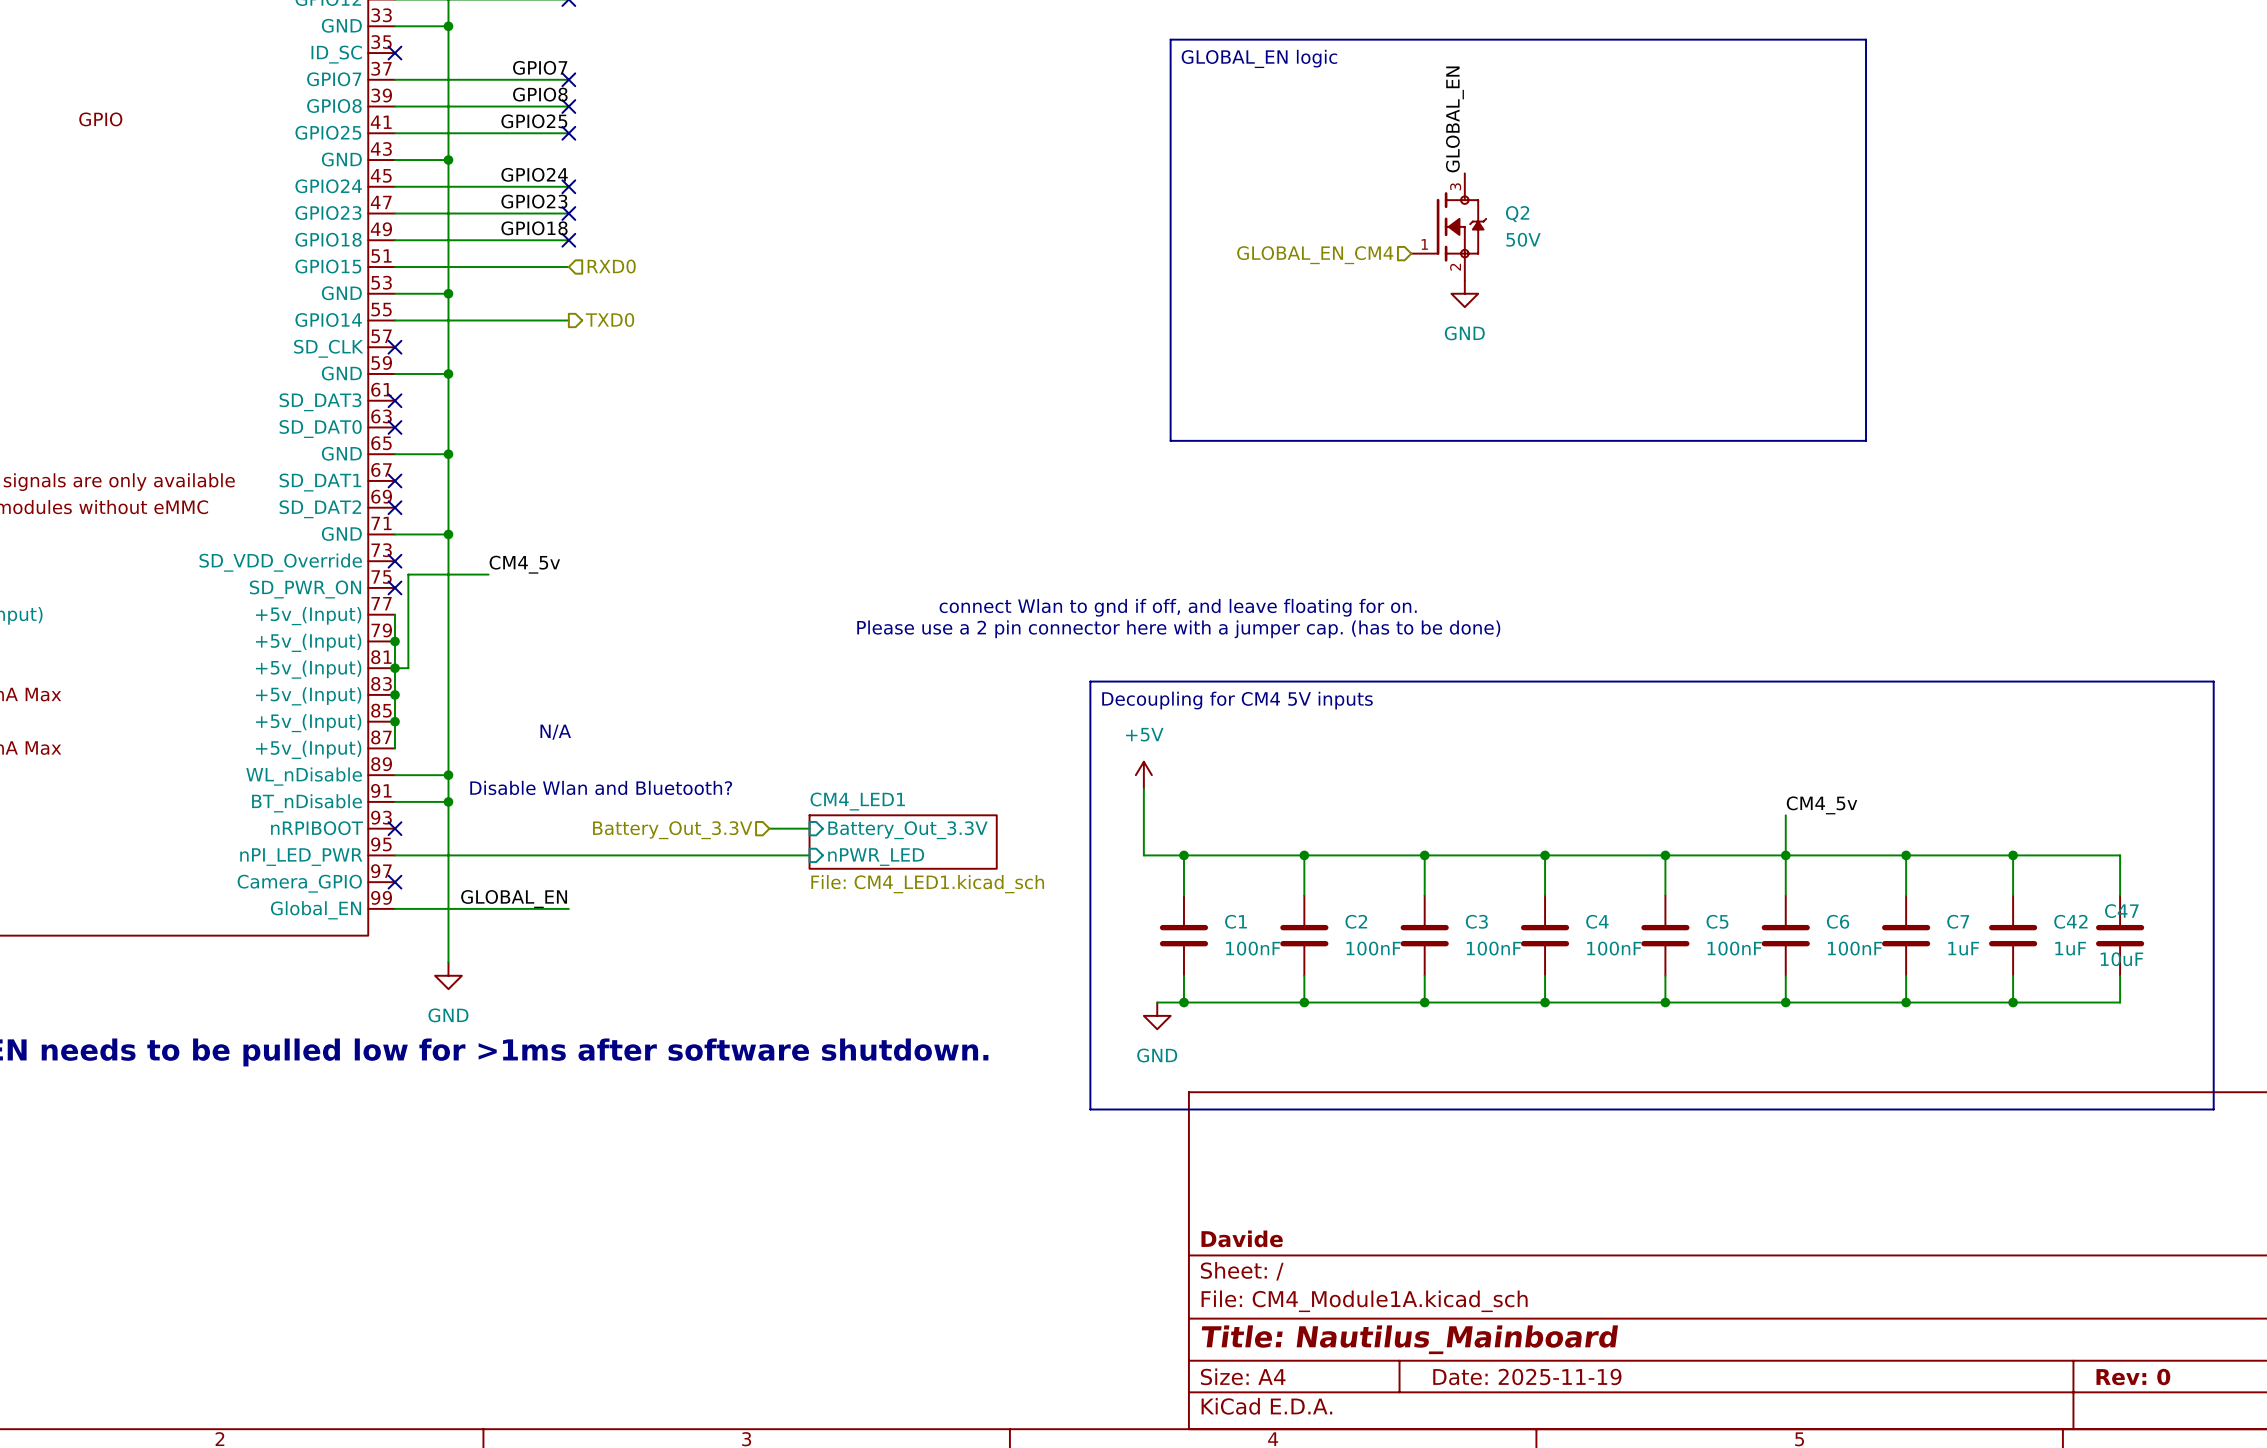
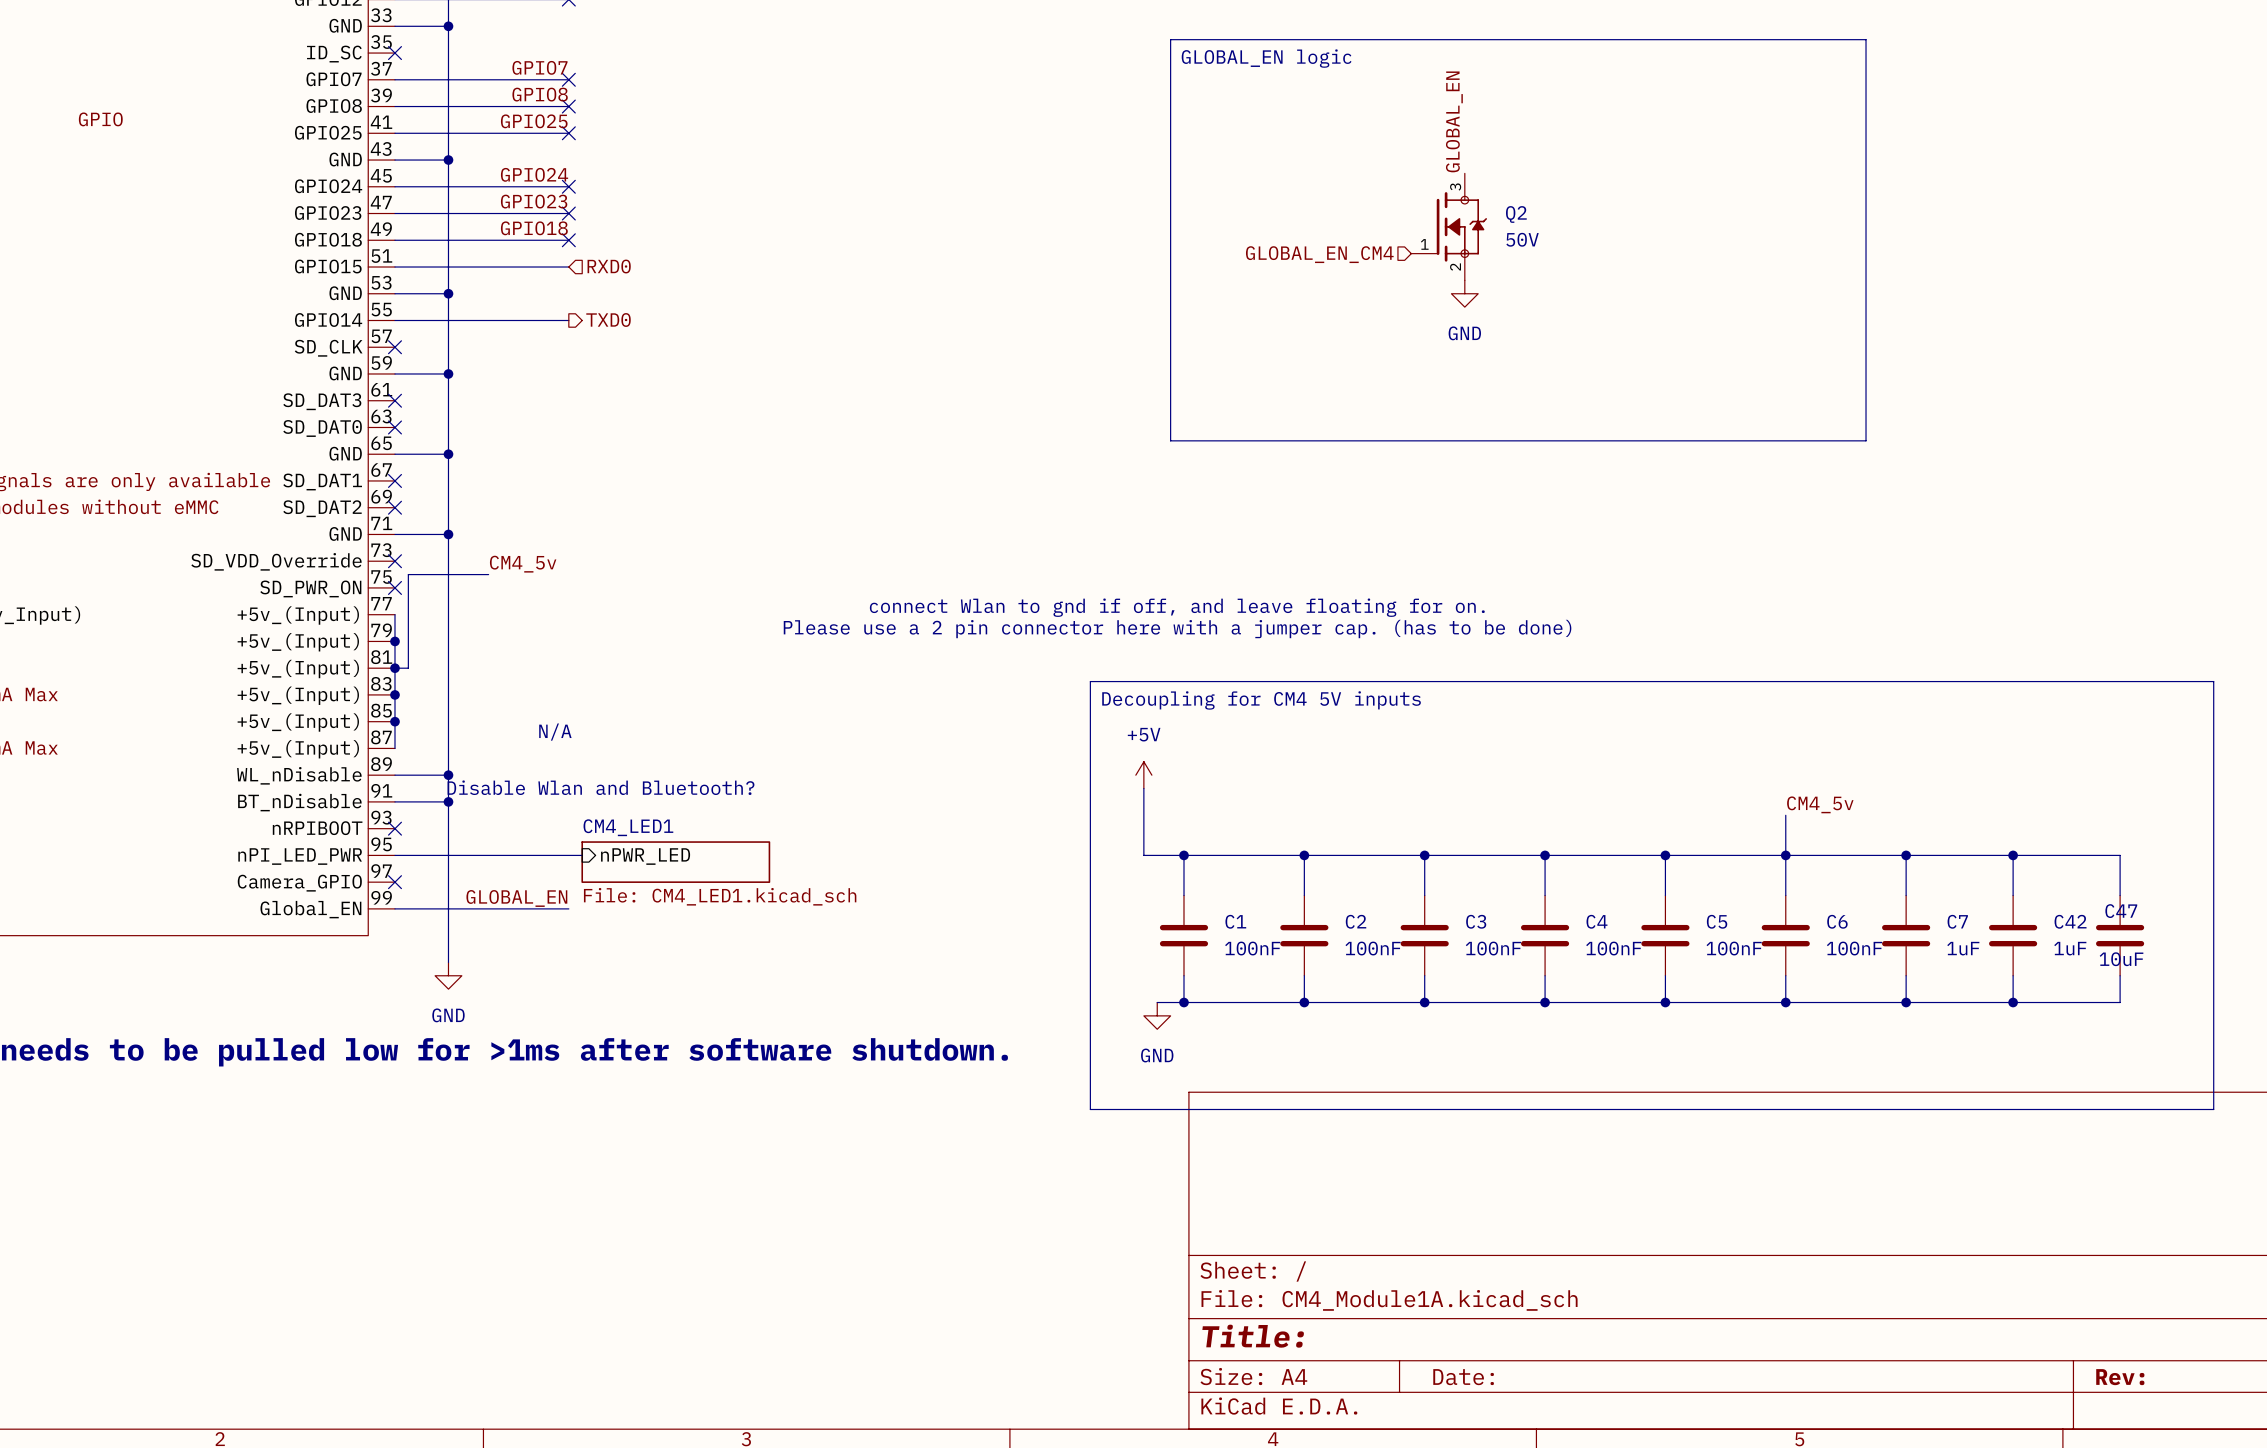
sheet CM4_LED1 shape: [808, 814, 998, 870] -> [581, 841, 771, 883]
wire: (769, 828) (809, 828) -> none
hierarchical label: Battery_Out_3.3V (672, 830) -> none
sheet pin: Battery_Out_3.3V (907, 830) -> none
wire: (582, 855) (809, 855) -> none
sheet pin position: nPWR_LED (876, 857) -> nPWR_LED (645, 856)
title block: Davide (1242, 1238) -> none
title block: Title: Nautilus_Mainboard (1409, 1339) -> Title: (1253, 1336)
title block: Date: 2025-11-19 (1527, 1377) -> Date: (1463, 1377)
title block: Rev: 0 (2133, 1377) -> Rev: (2120, 1377)

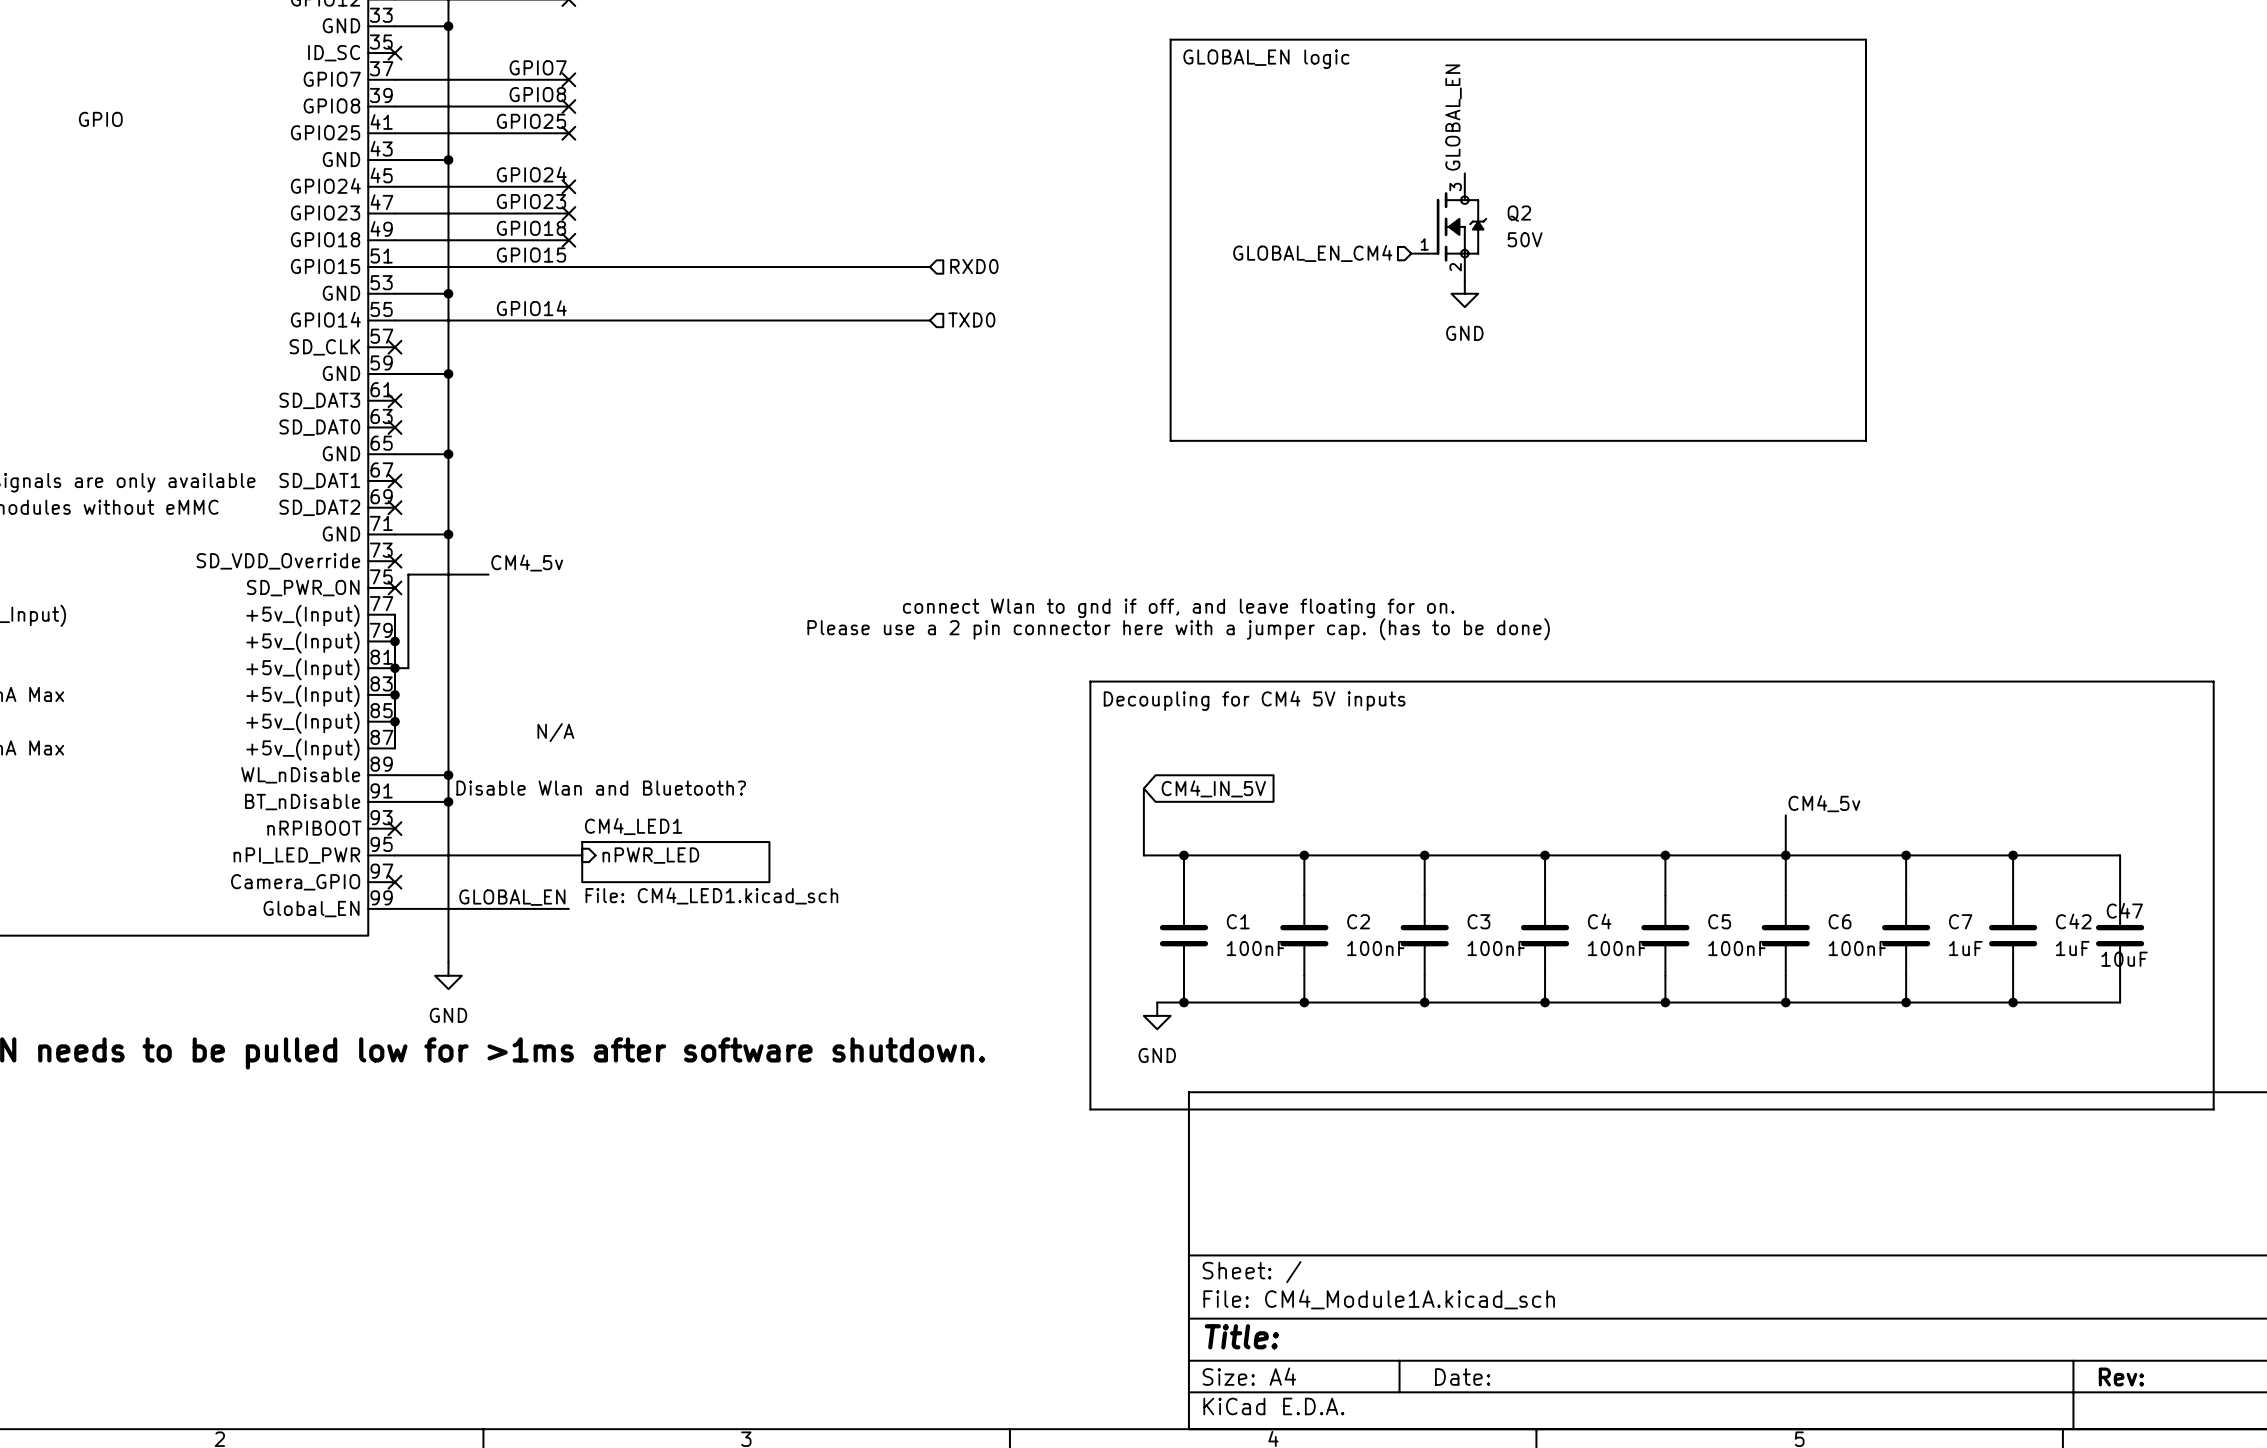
label: none -> GPIO15 (531, 255)
hierarchical label: RXD0 (609, 266) -> none
hierarchical label: none -> RXD0 (974, 266)
wire: none -> (568, 267) (929, 267)
label: none -> GPIO14 (531, 308)
wire: none -> (568, 320) (929, 320)
hierarchical label: TXD0 (608, 320) -> none
hierarchical label: none -> TXD0 (971, 320)
power symbol: +5V (1143, 775) -> none
global label: none -> CM4_IN_5V (1213, 788)

